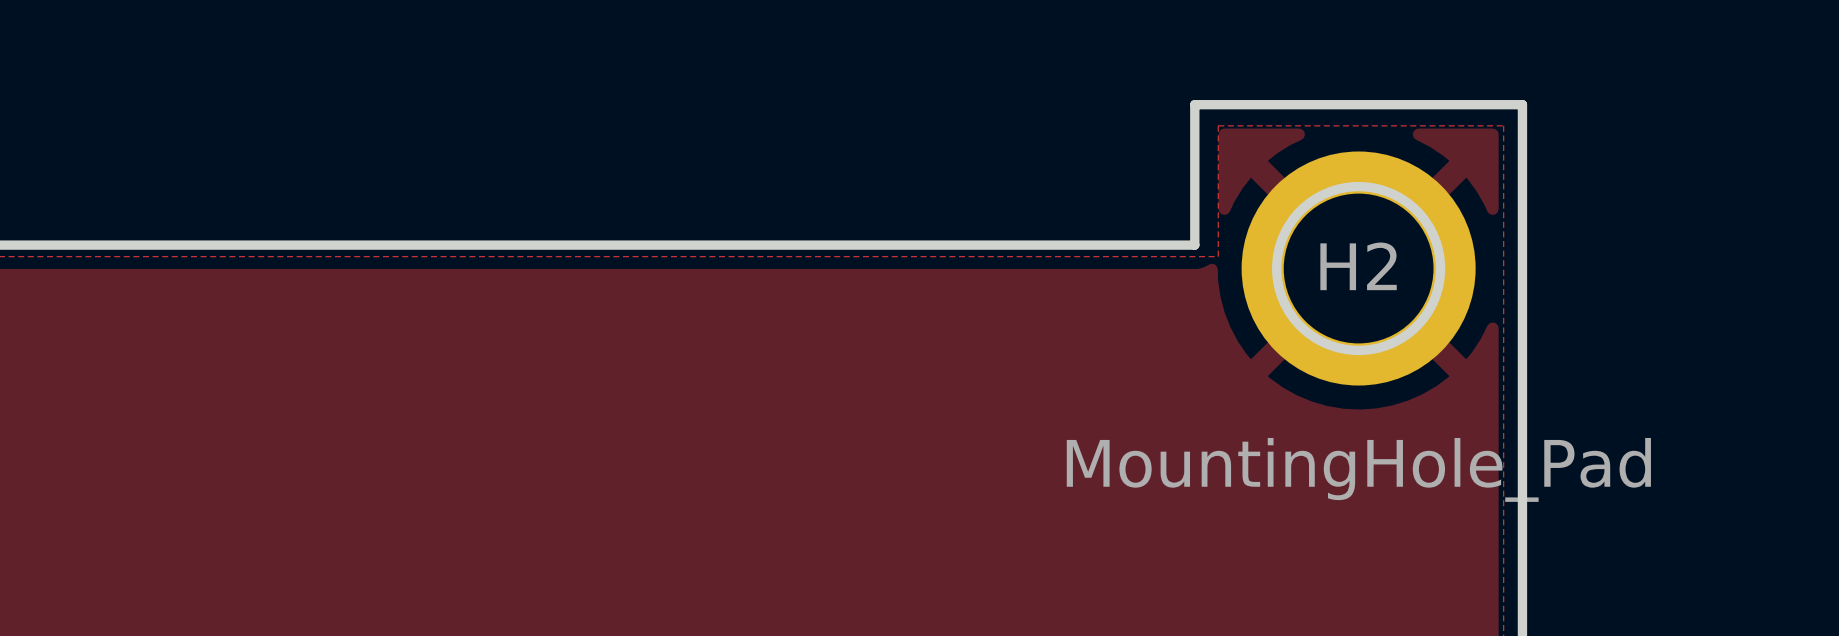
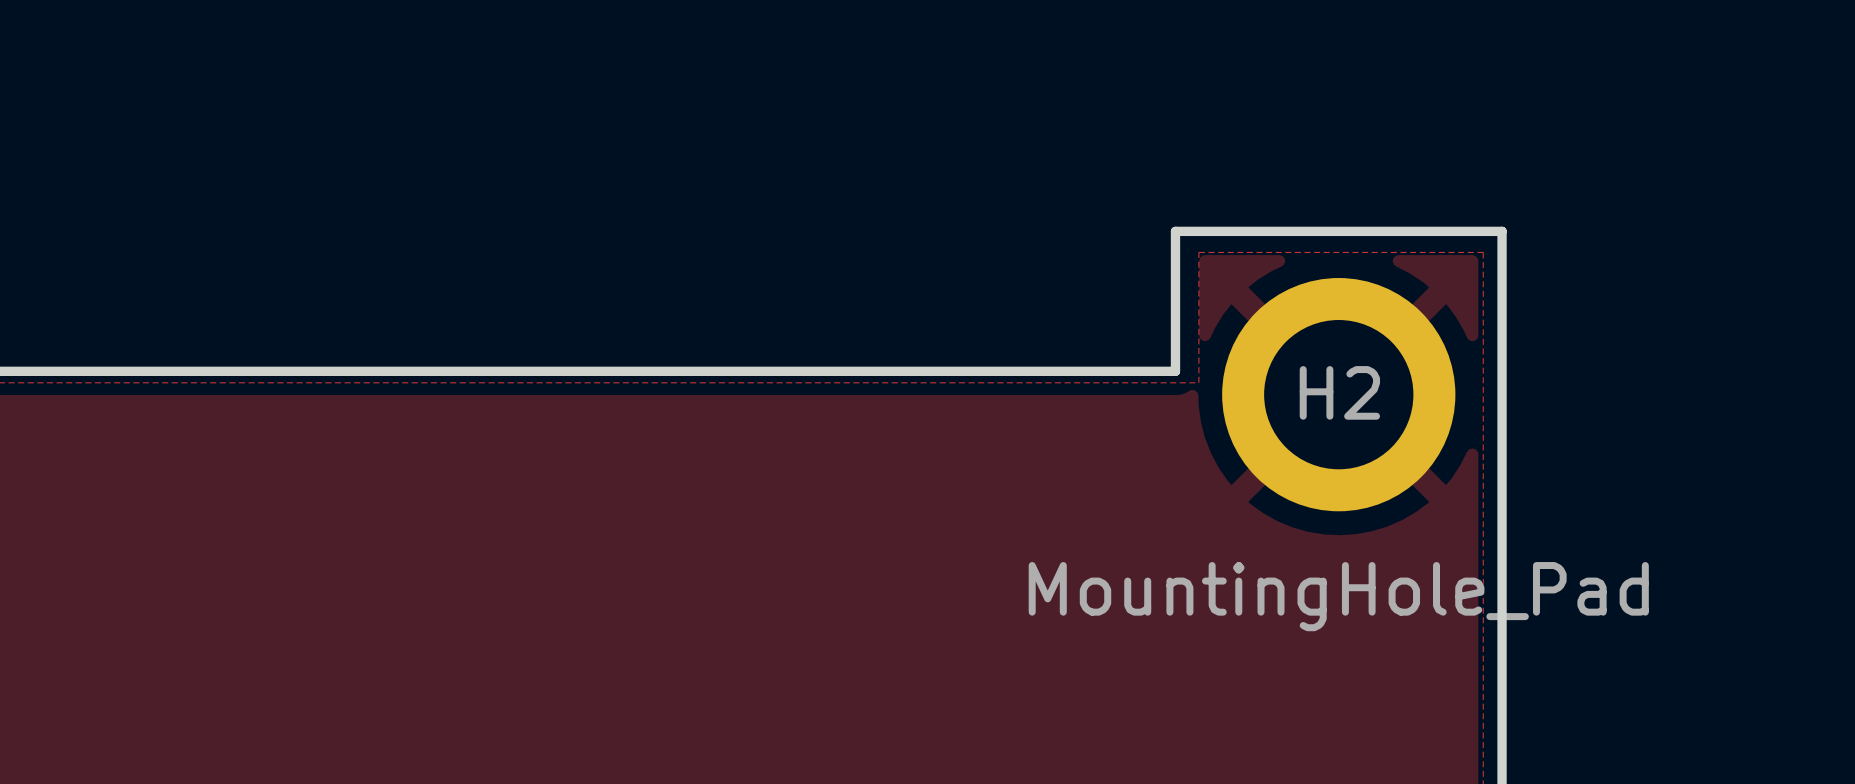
round board edge: [1272, 181, 1446, 356] -> none

